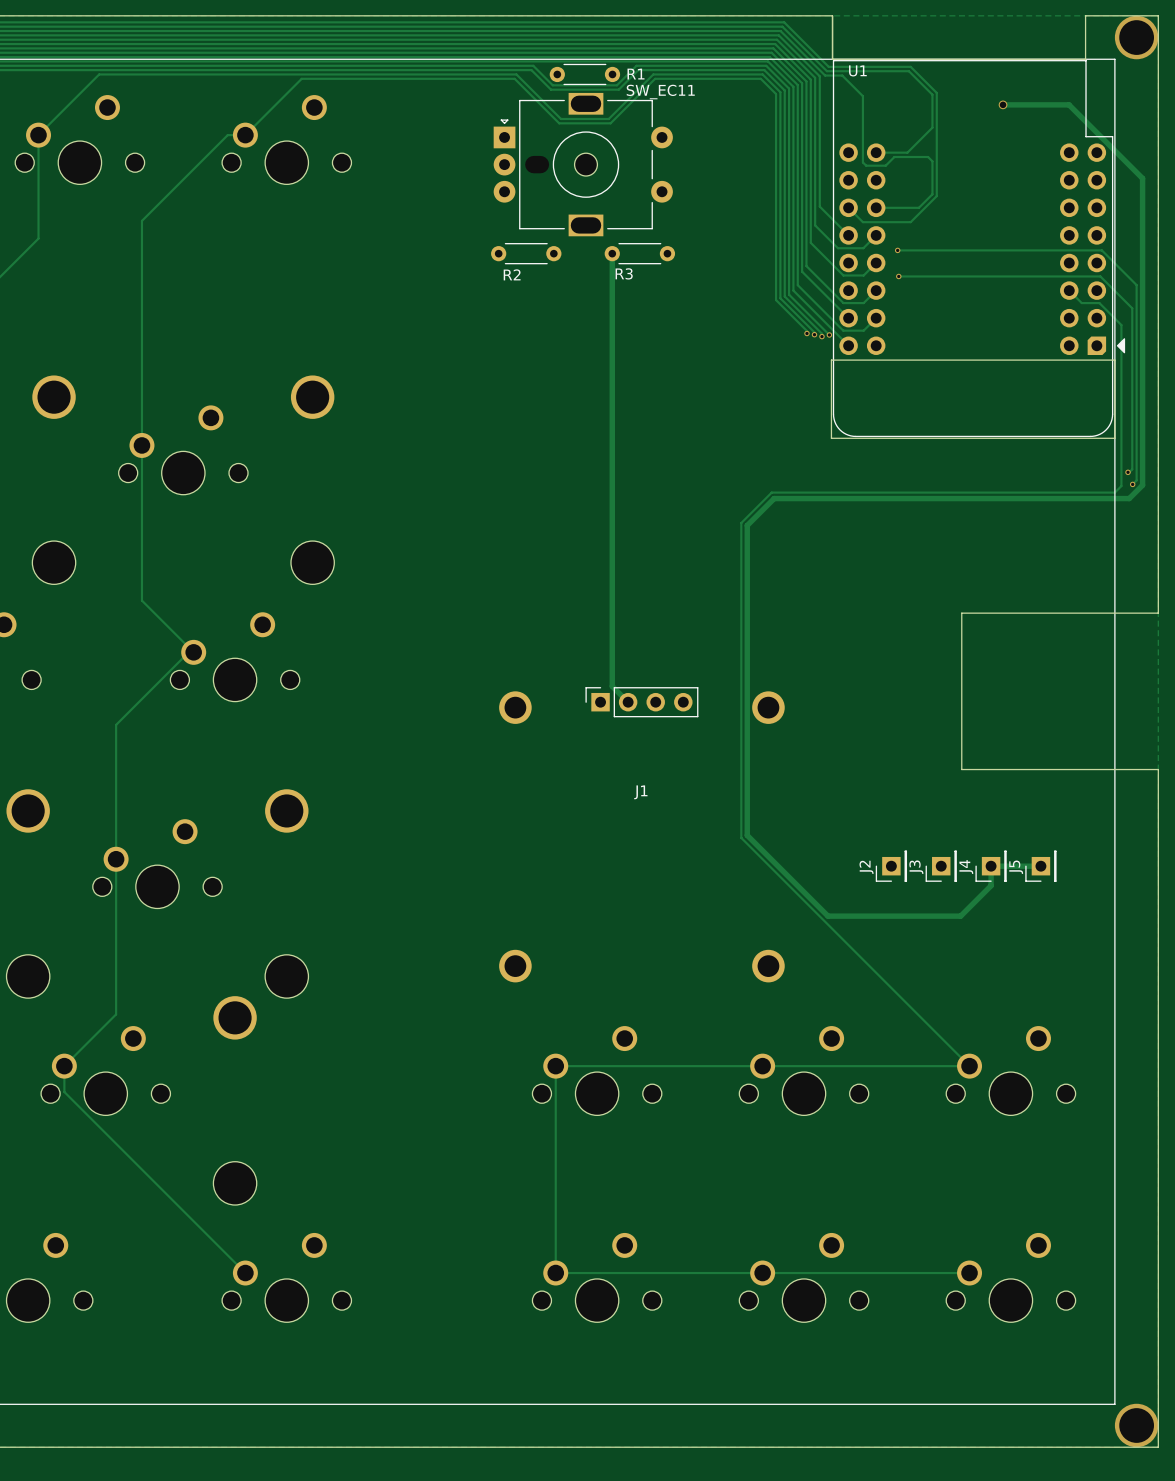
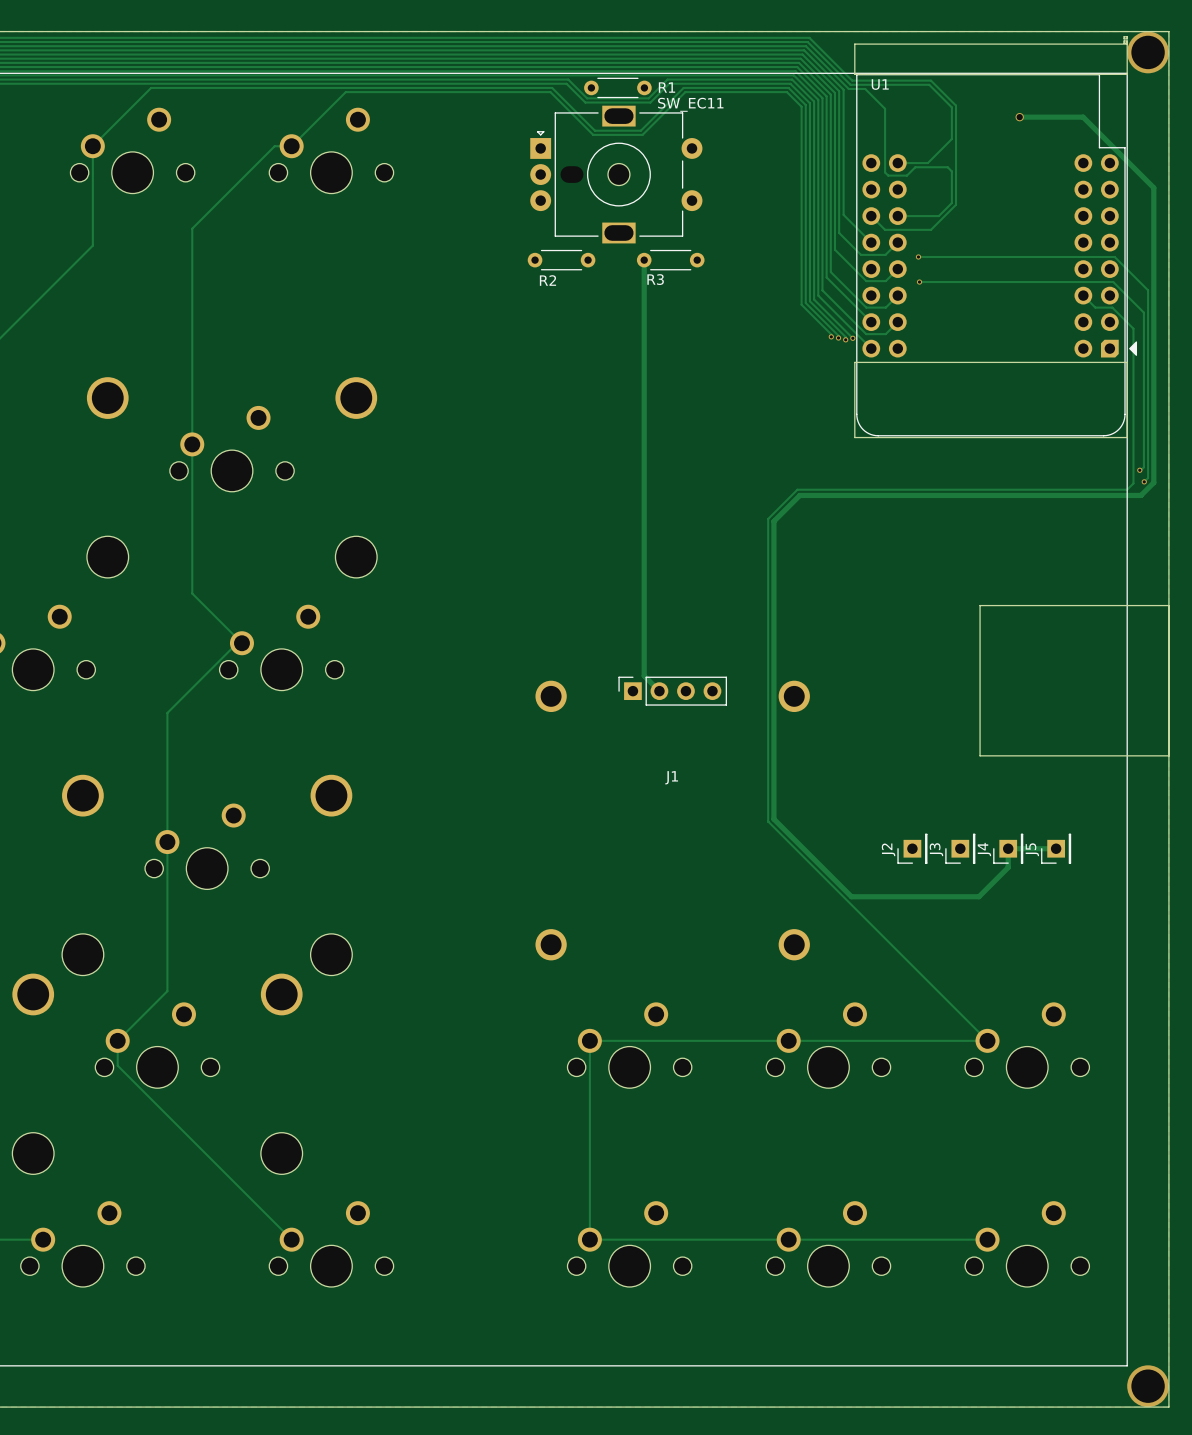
board edge: (832, 15) (832, 59) (1085, 59) (1085, 15) -> (855, 31) (1099, 31)
board edge: none -> (1124, 36) (1127, 36) (1127, 38) (1124, 38) (1124, 36)
board edge: none -> (1124, 40) (1124, 43) (1127, 43) (1127, 40) (1124, 40)
board edge: none -> (854, 44) (1127, 44) (1127, 74) (854, 74) (854, 44)
board edge: none -> (1168, 605) (1168, 755)

